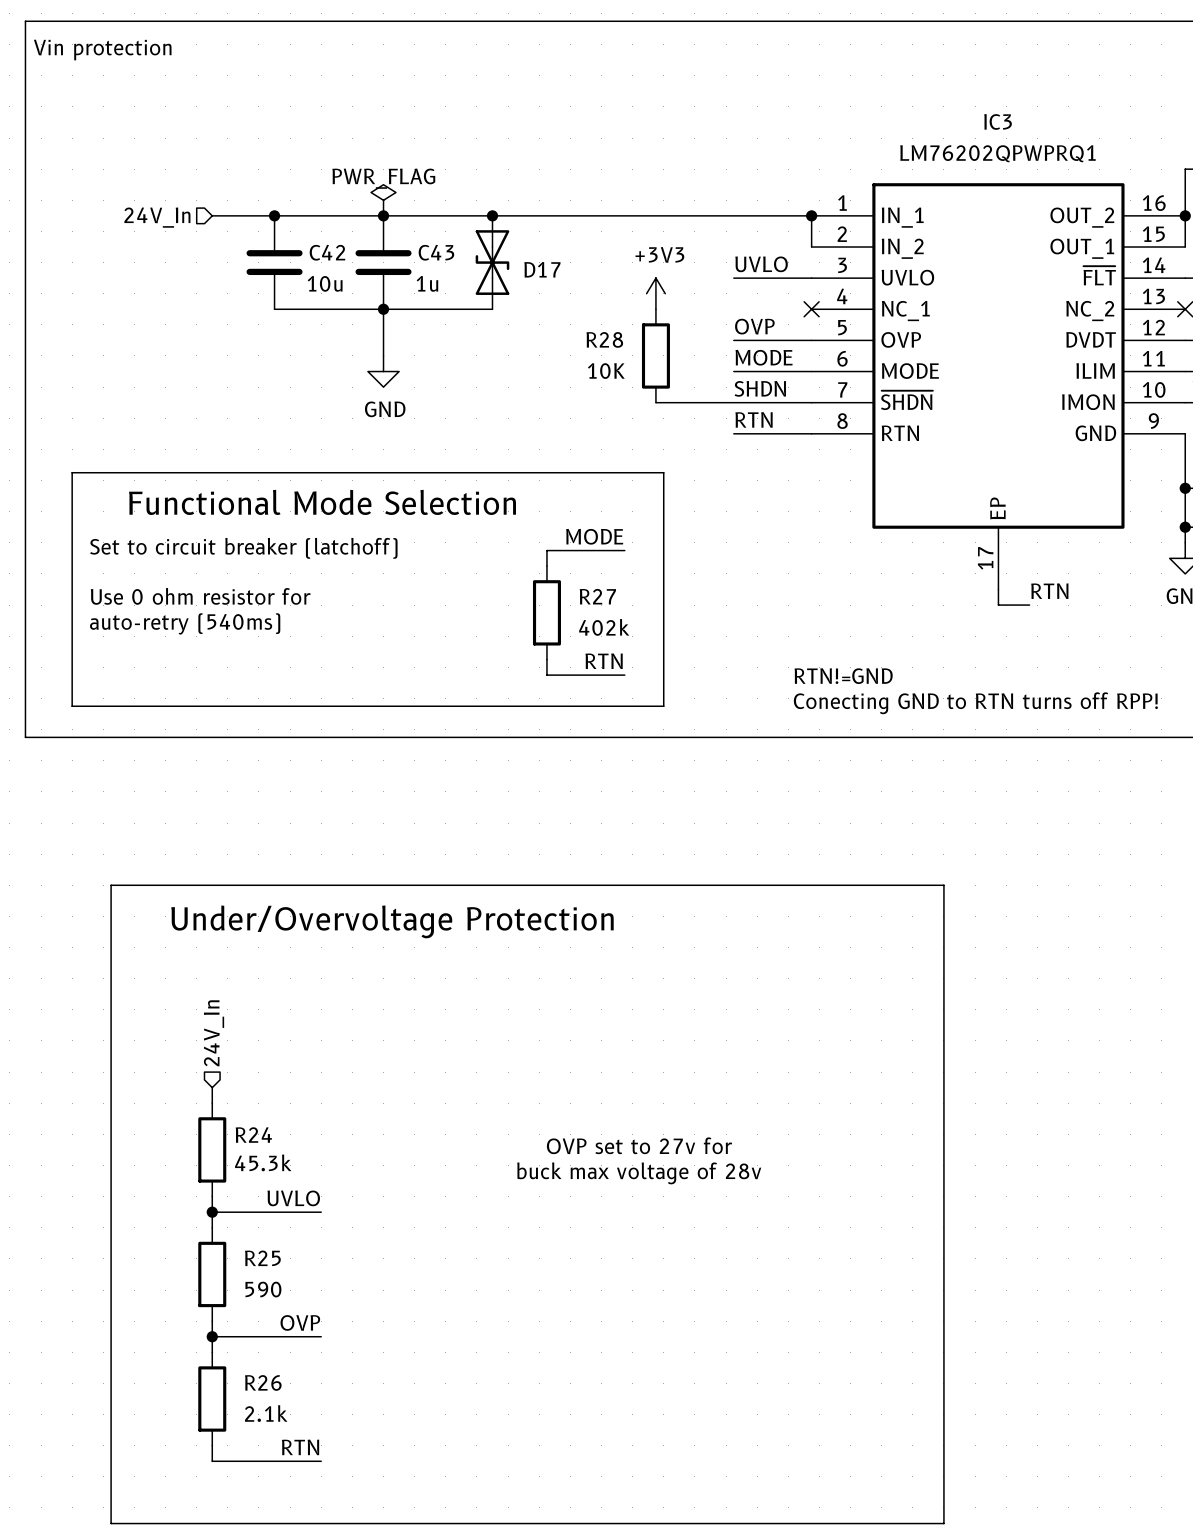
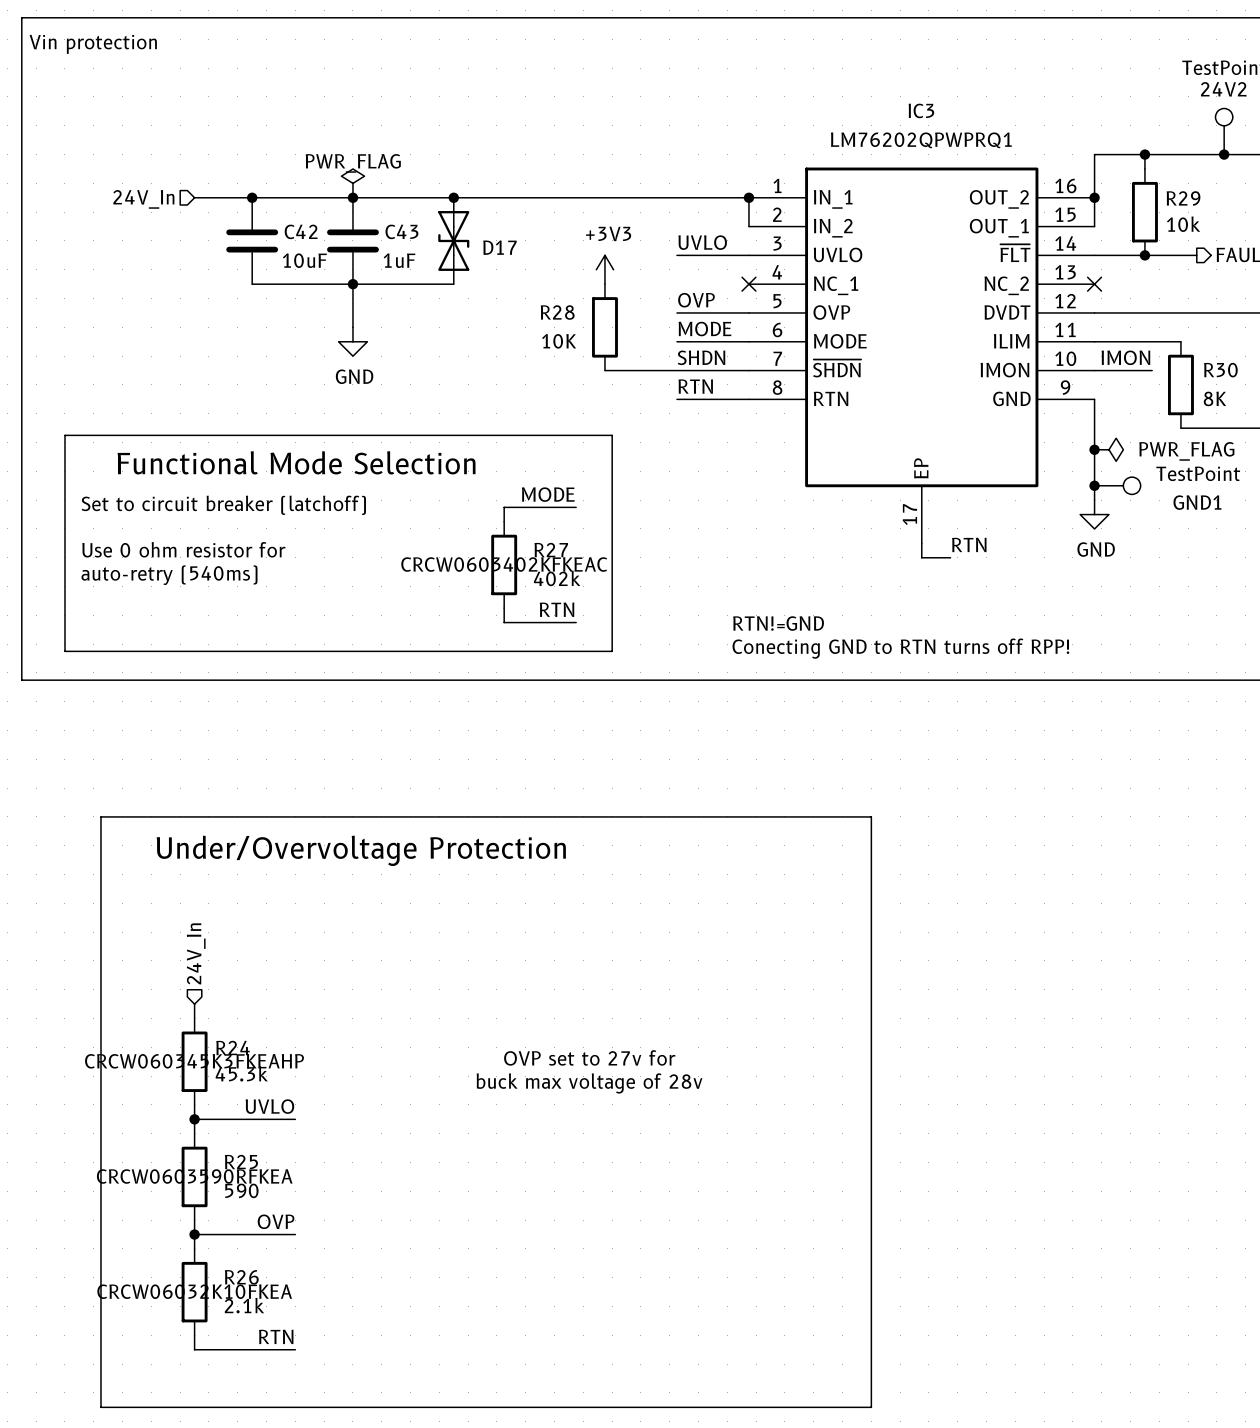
C42 value: 10u (325, 283) -> 10uF (304, 260)
C43 value: 1u (427, 283) -> 1uF (399, 260)
R27 text: none -> CRCW0603402KFKEAC (504, 564)
R24 text: none -> CRCW060345K3FKEAHP (194, 1061)
R25 text: none -> CRCW0603590RFKEA (194, 1176)
R26 text: none -> CRCW06032K10FKEA (194, 1291)

